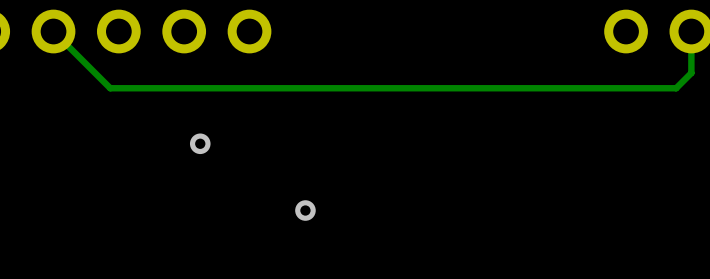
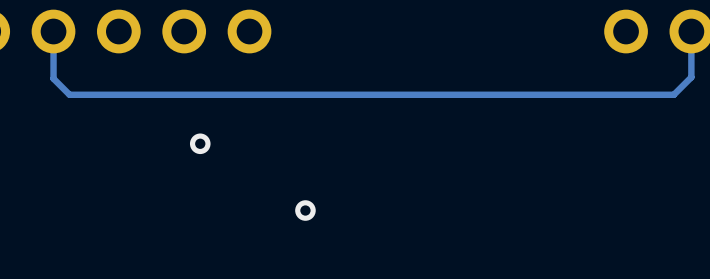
track: (53, 31) (110, 88) (676, 88) (691, 73) -> (53, 31) (53, 78) (69, 94) (673, 94) (691, 77) (691, 73)

